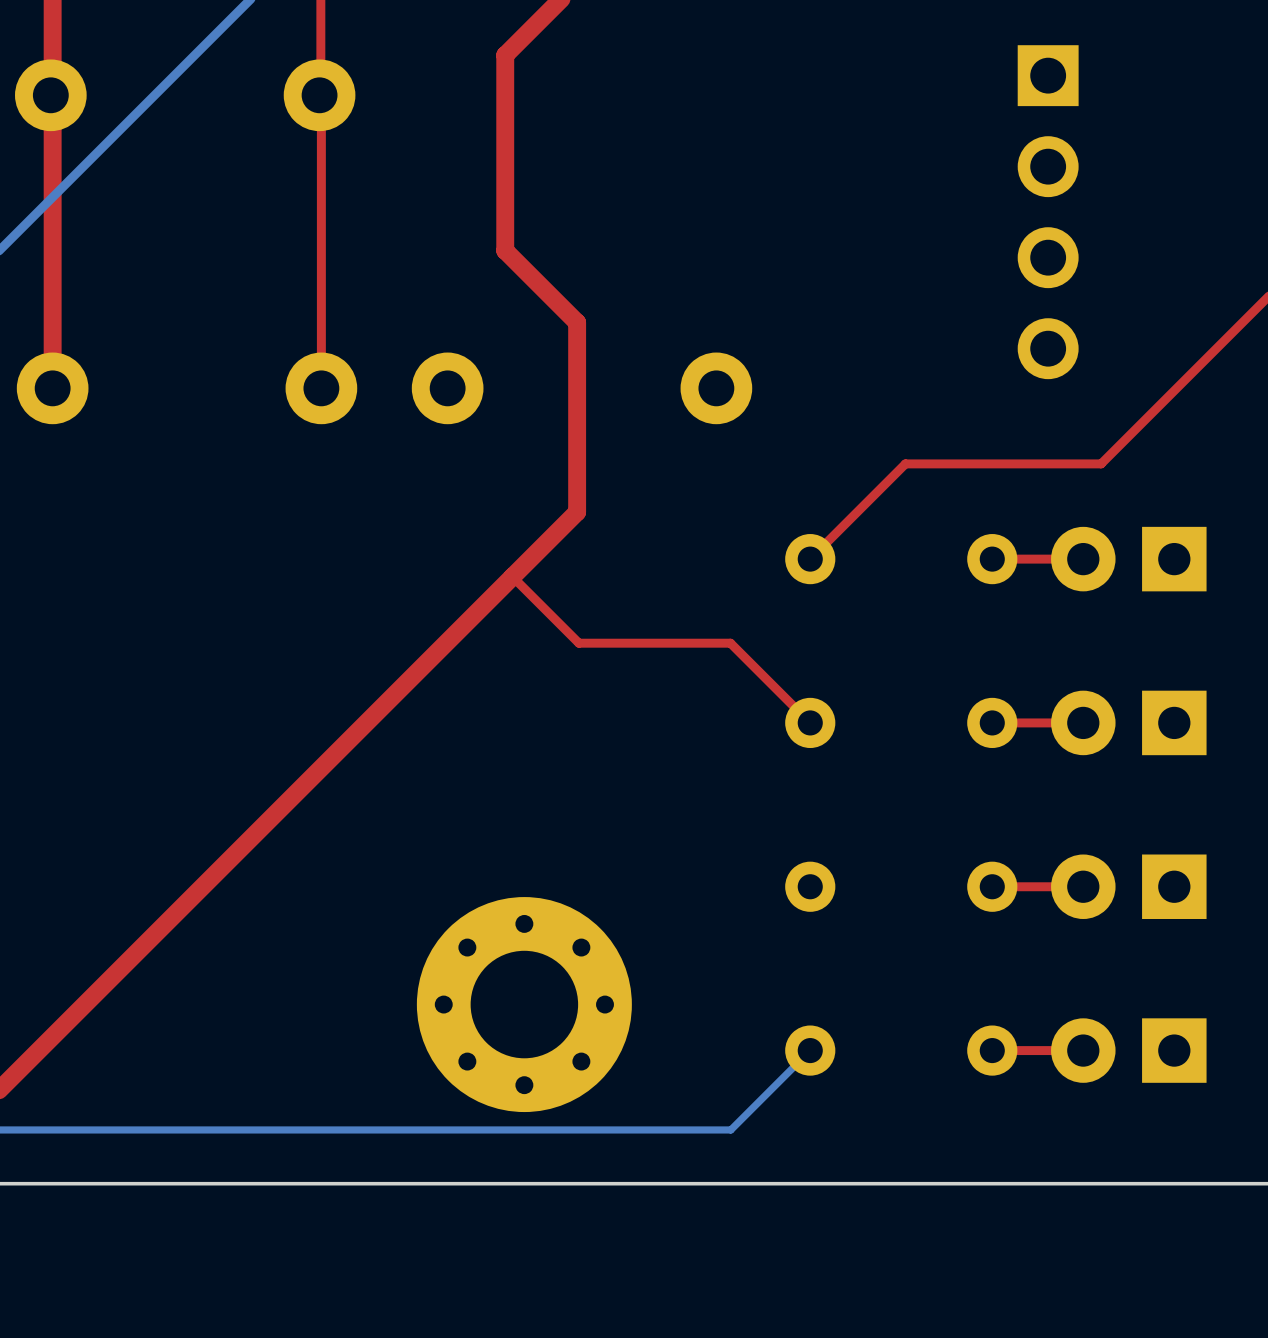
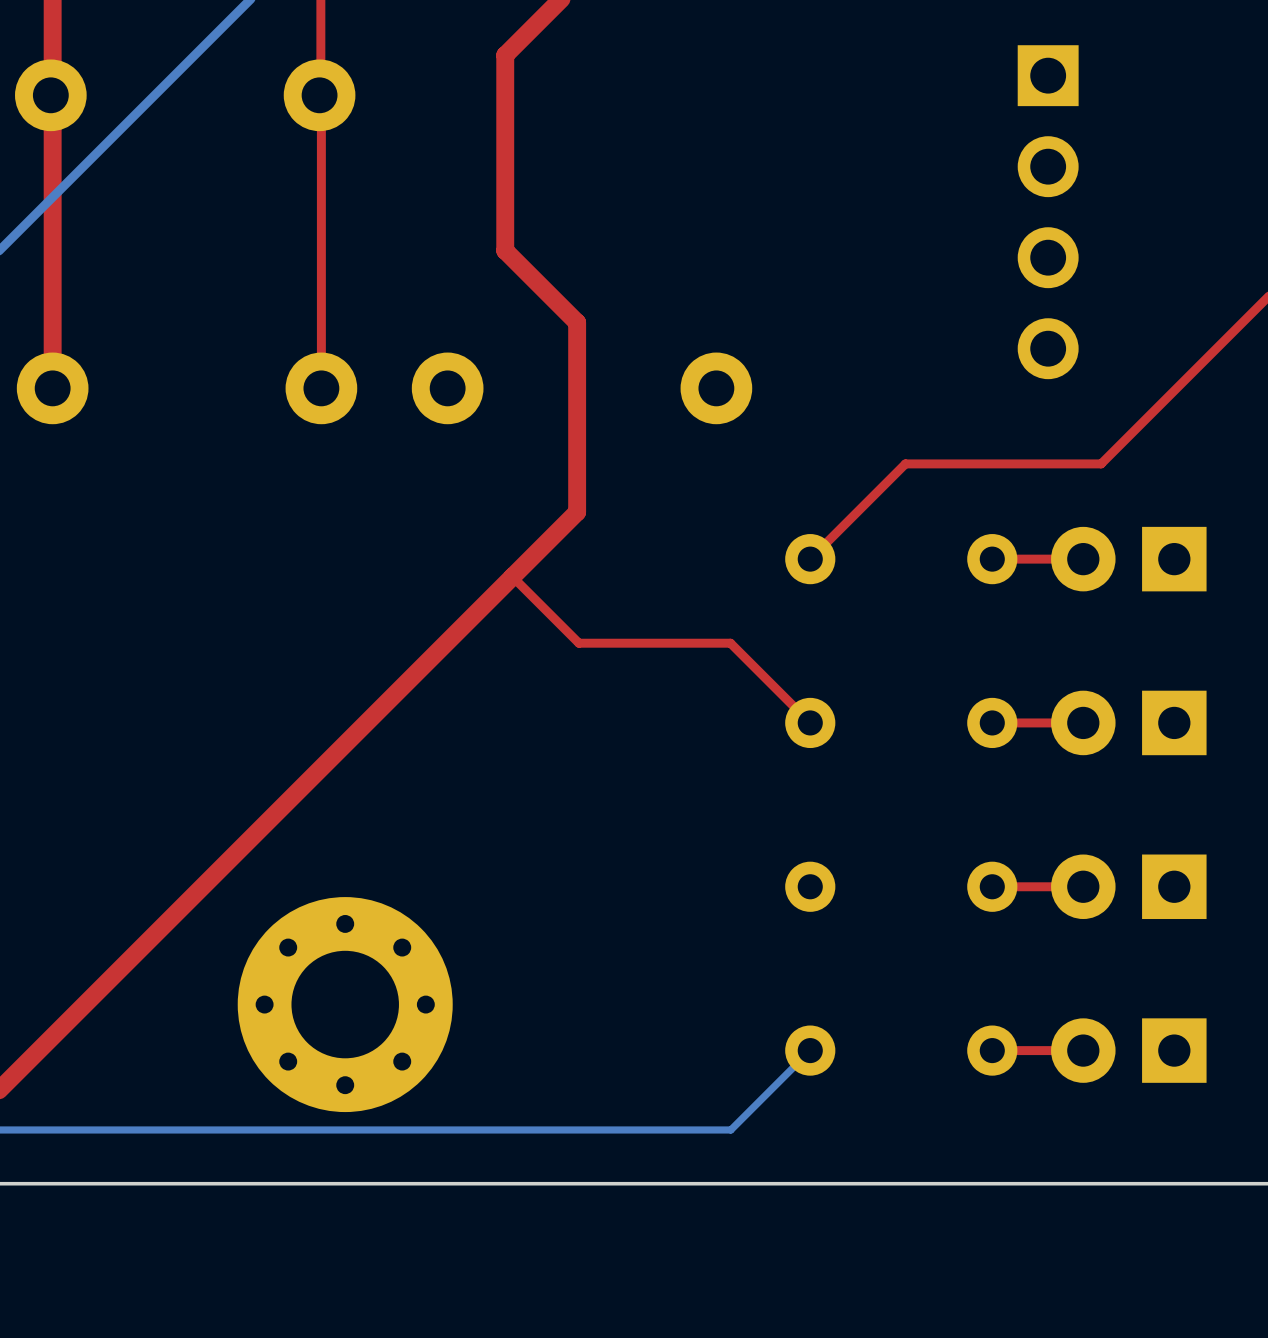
part position: (524, 1004) -> (345, 1004)

